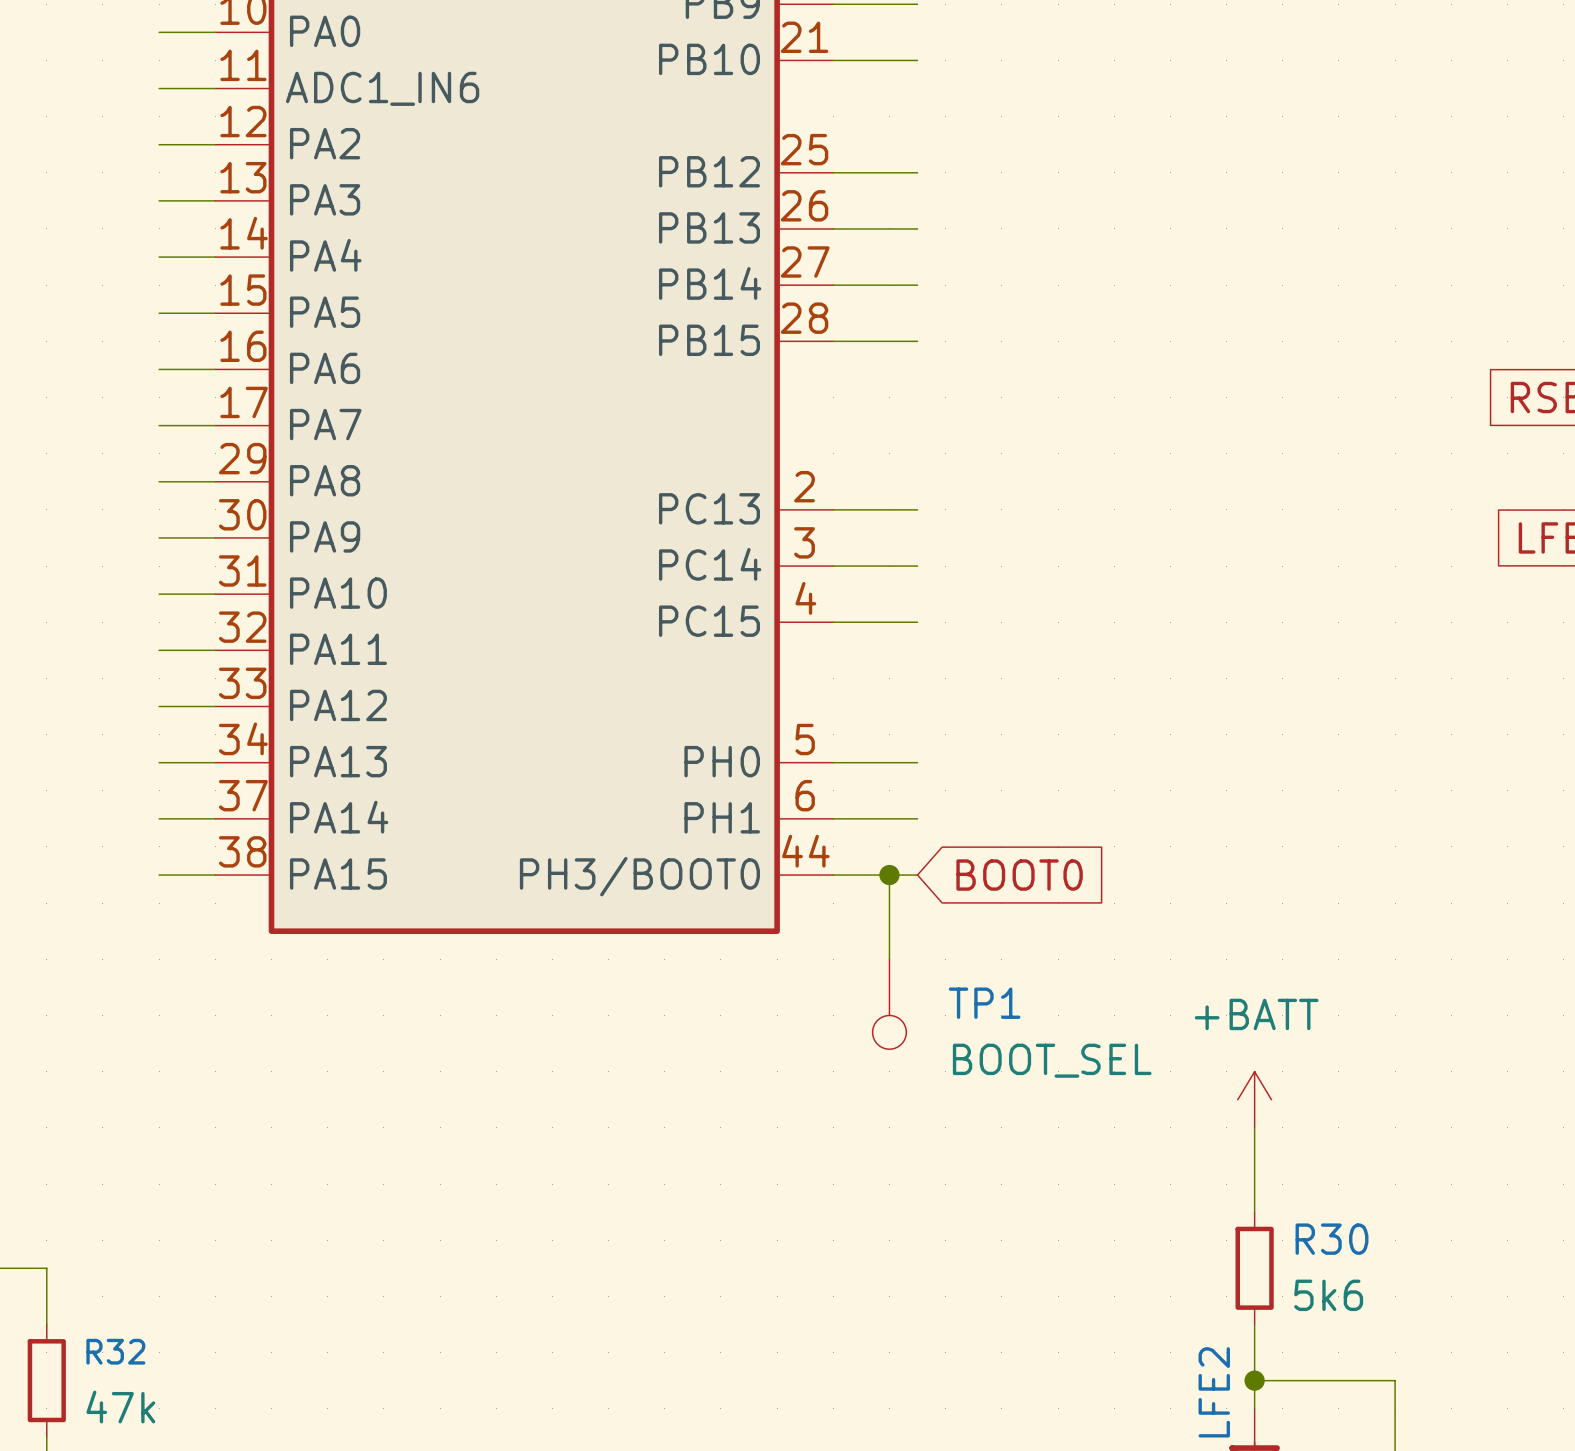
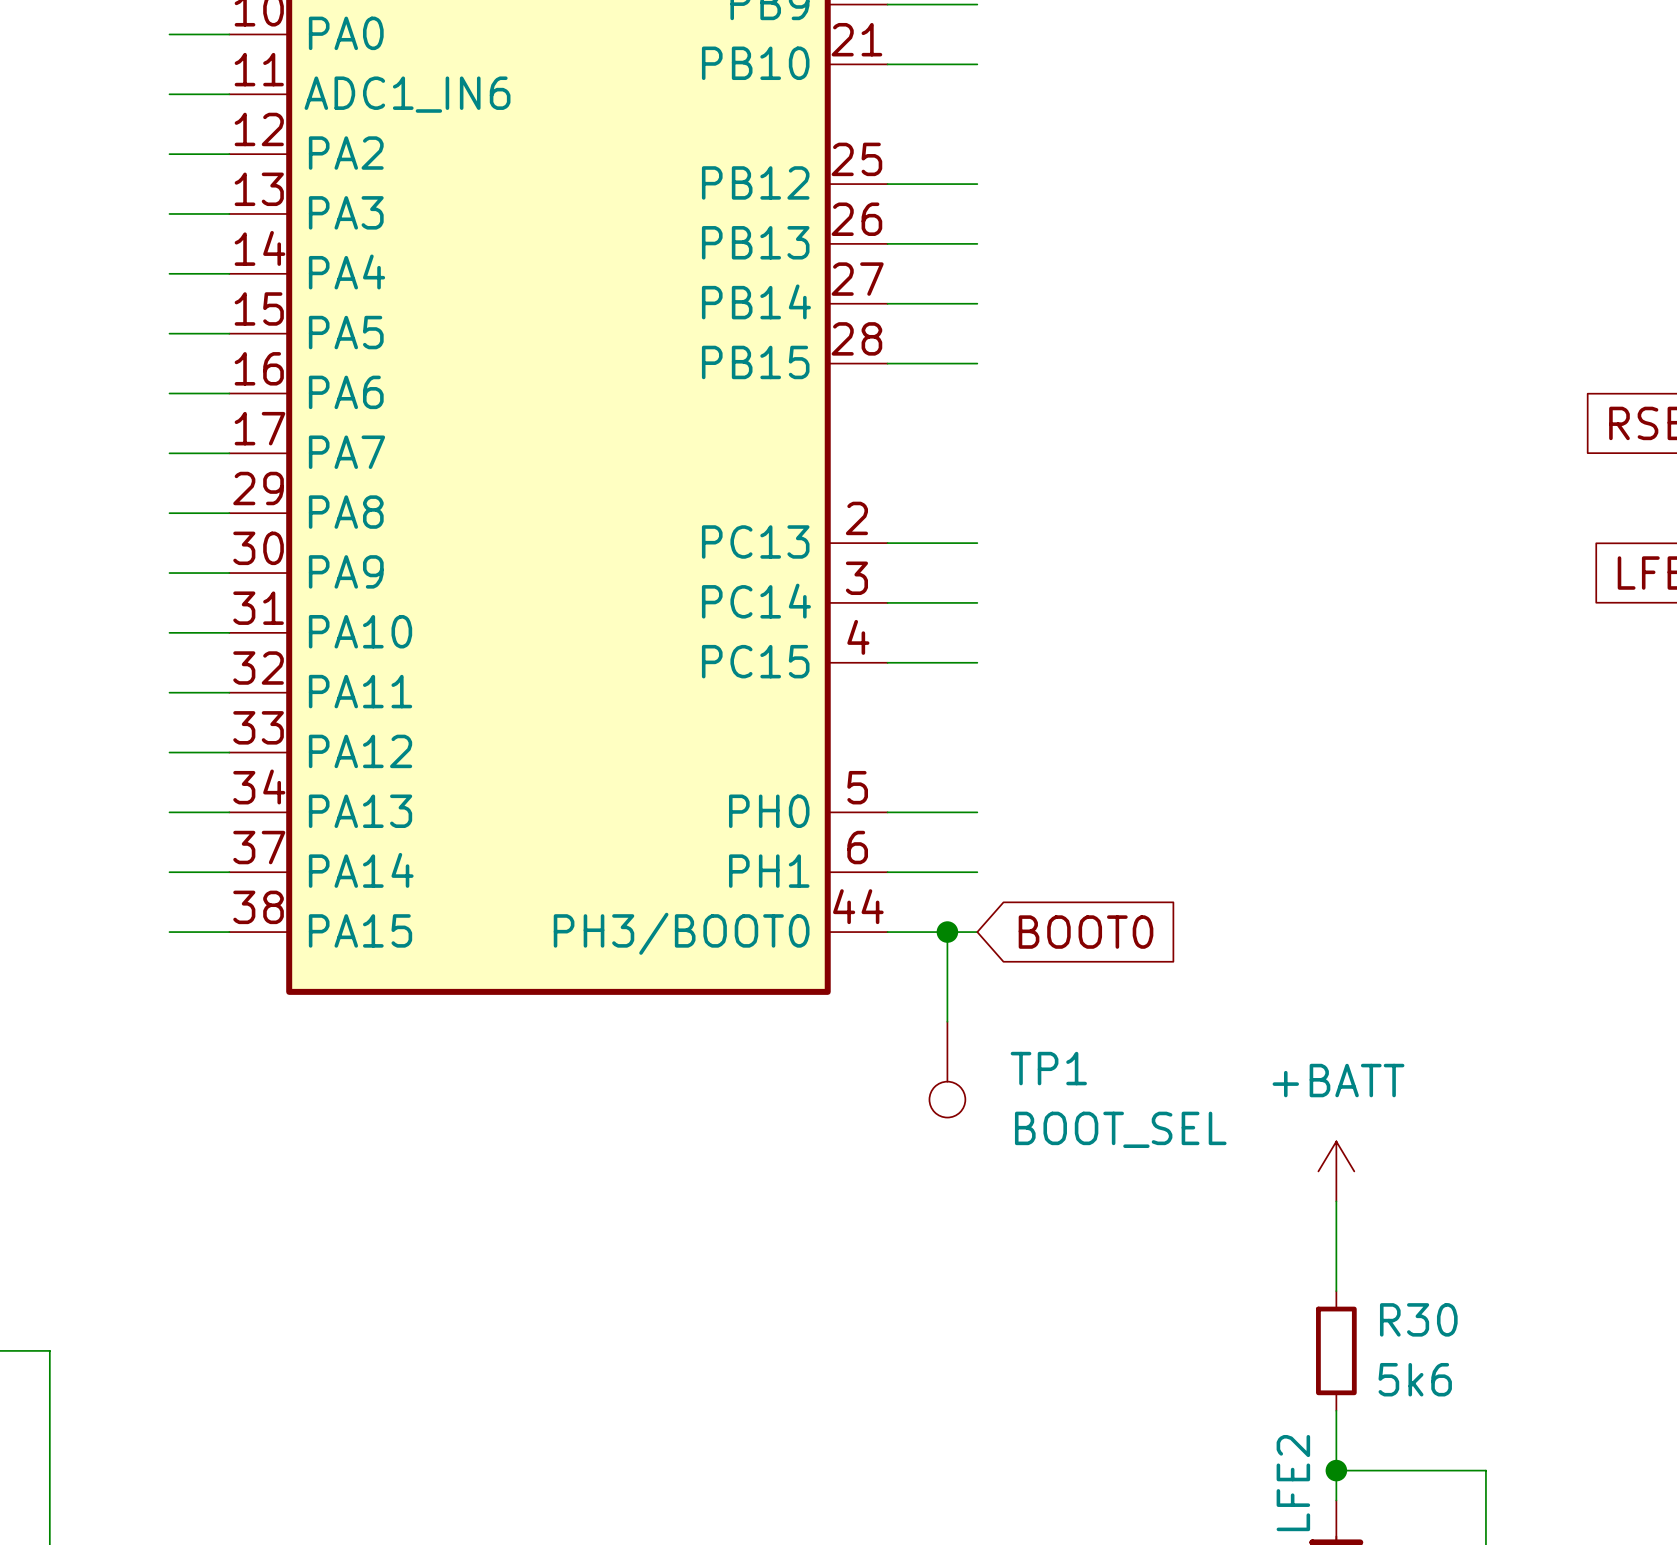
wire: none -> (49, 1410) (49, 1530)
R32: 47k (46, 1380) -> none

